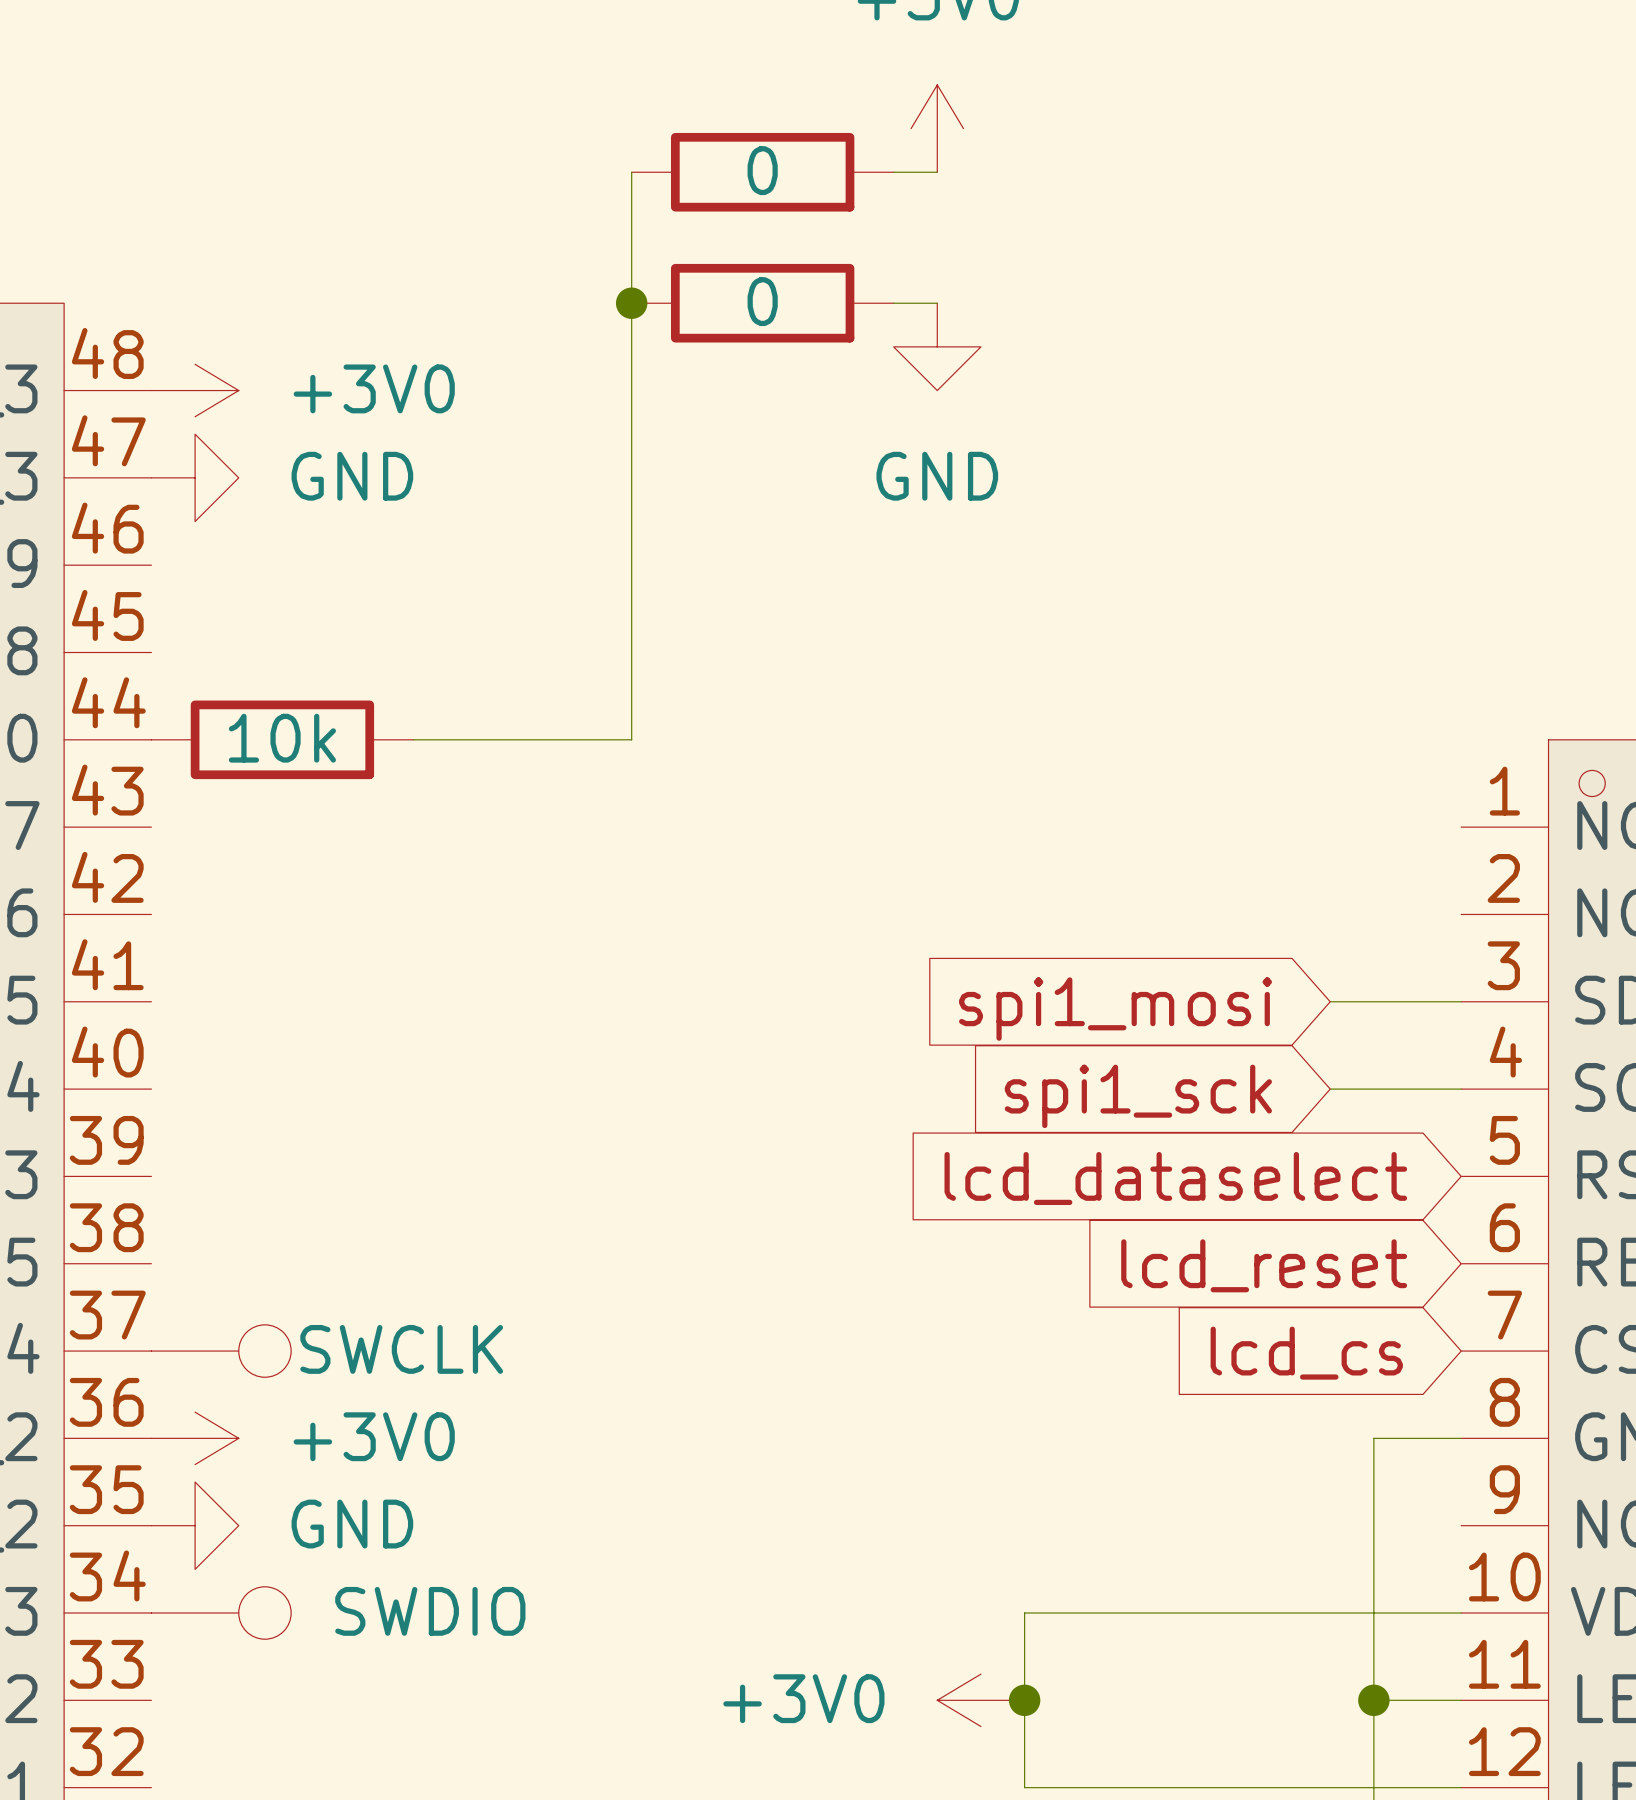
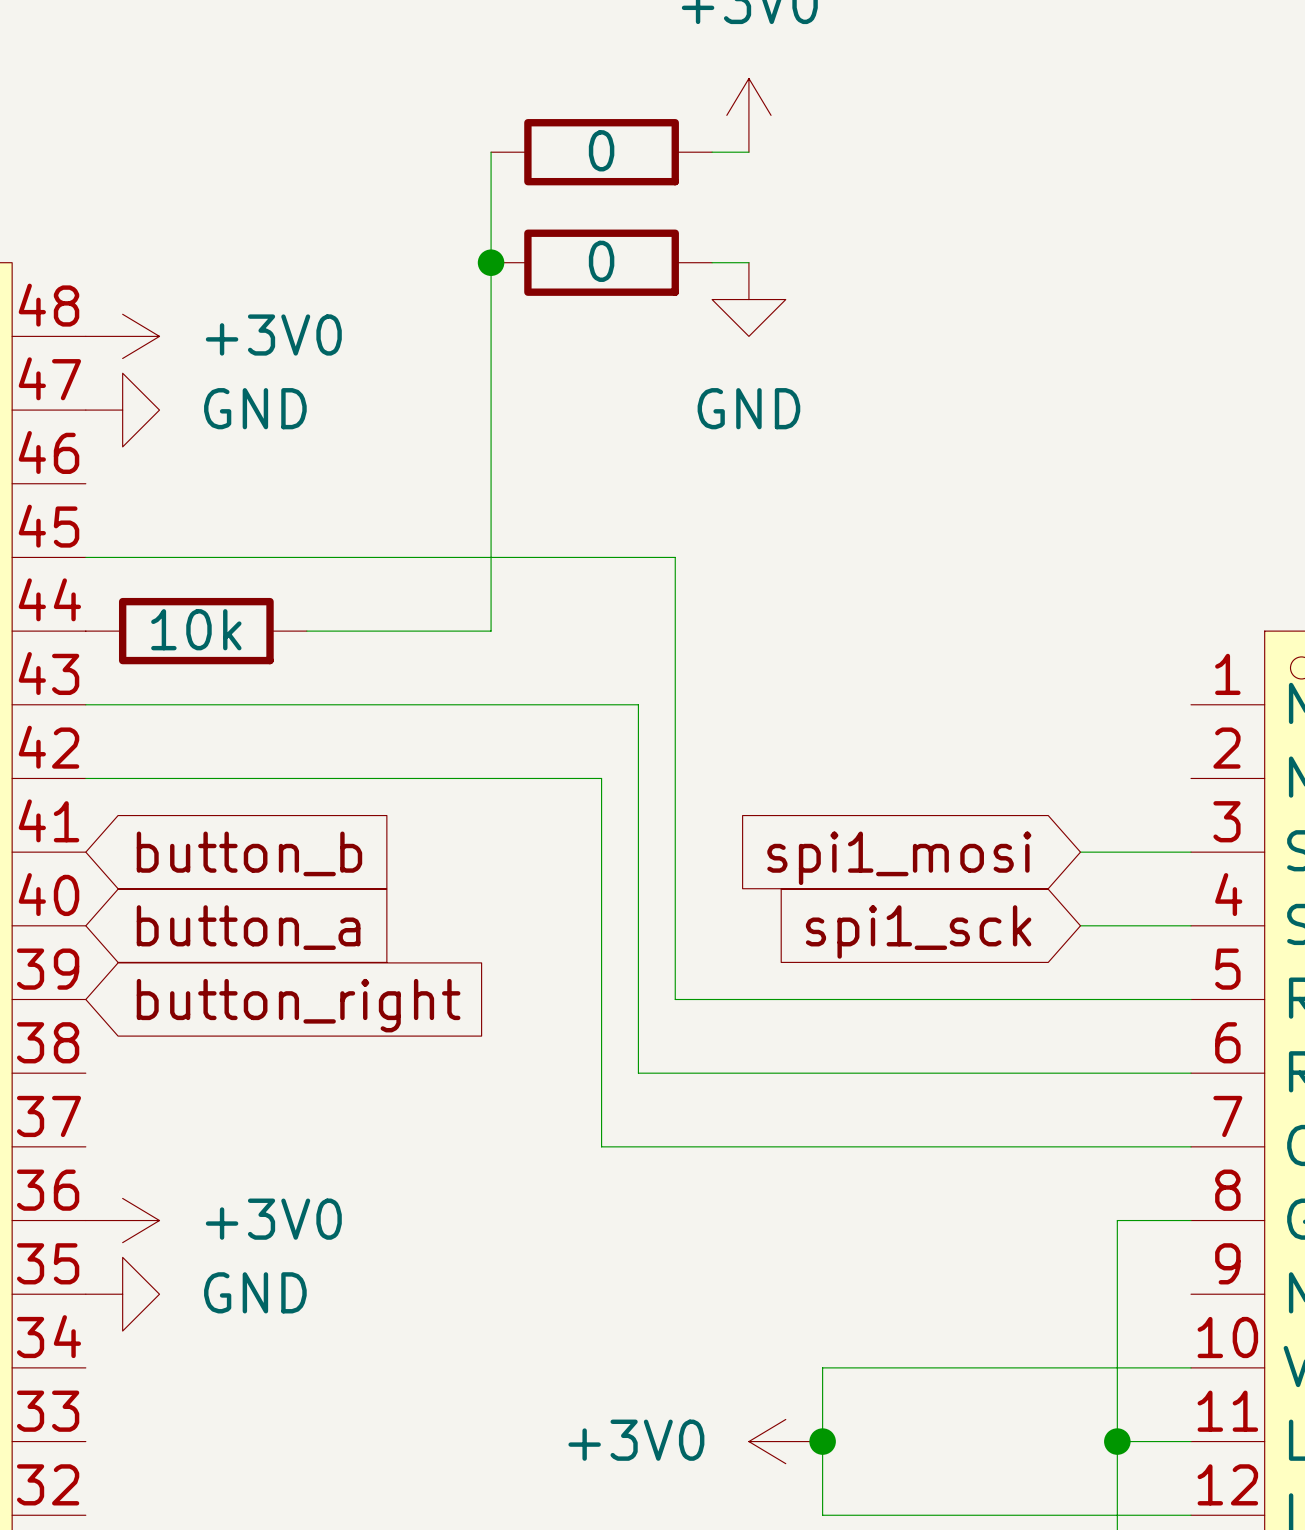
wire: none -> (85, 557) (675, 557) (675, 999) (1191, 999)
wire: none -> (85, 704) (638, 704) (638, 1073) (1191, 1073)
wire: none -> (85, 778) (601, 778) (601, 1146) (1191, 1146)
global label: none -> button_b (249, 853)
global label: none -> button_a (248, 927)
global label: lcd_dataselect (1175, 1178) -> none
global label: none -> button_right (298, 1005)
global label: lcd_reset (1264, 1265) -> none
part: SWCLK (221, 1351) -> none
global label: lcd_cs (1306, 1353) -> none
part: SWDIO (221, 1613) -> none

